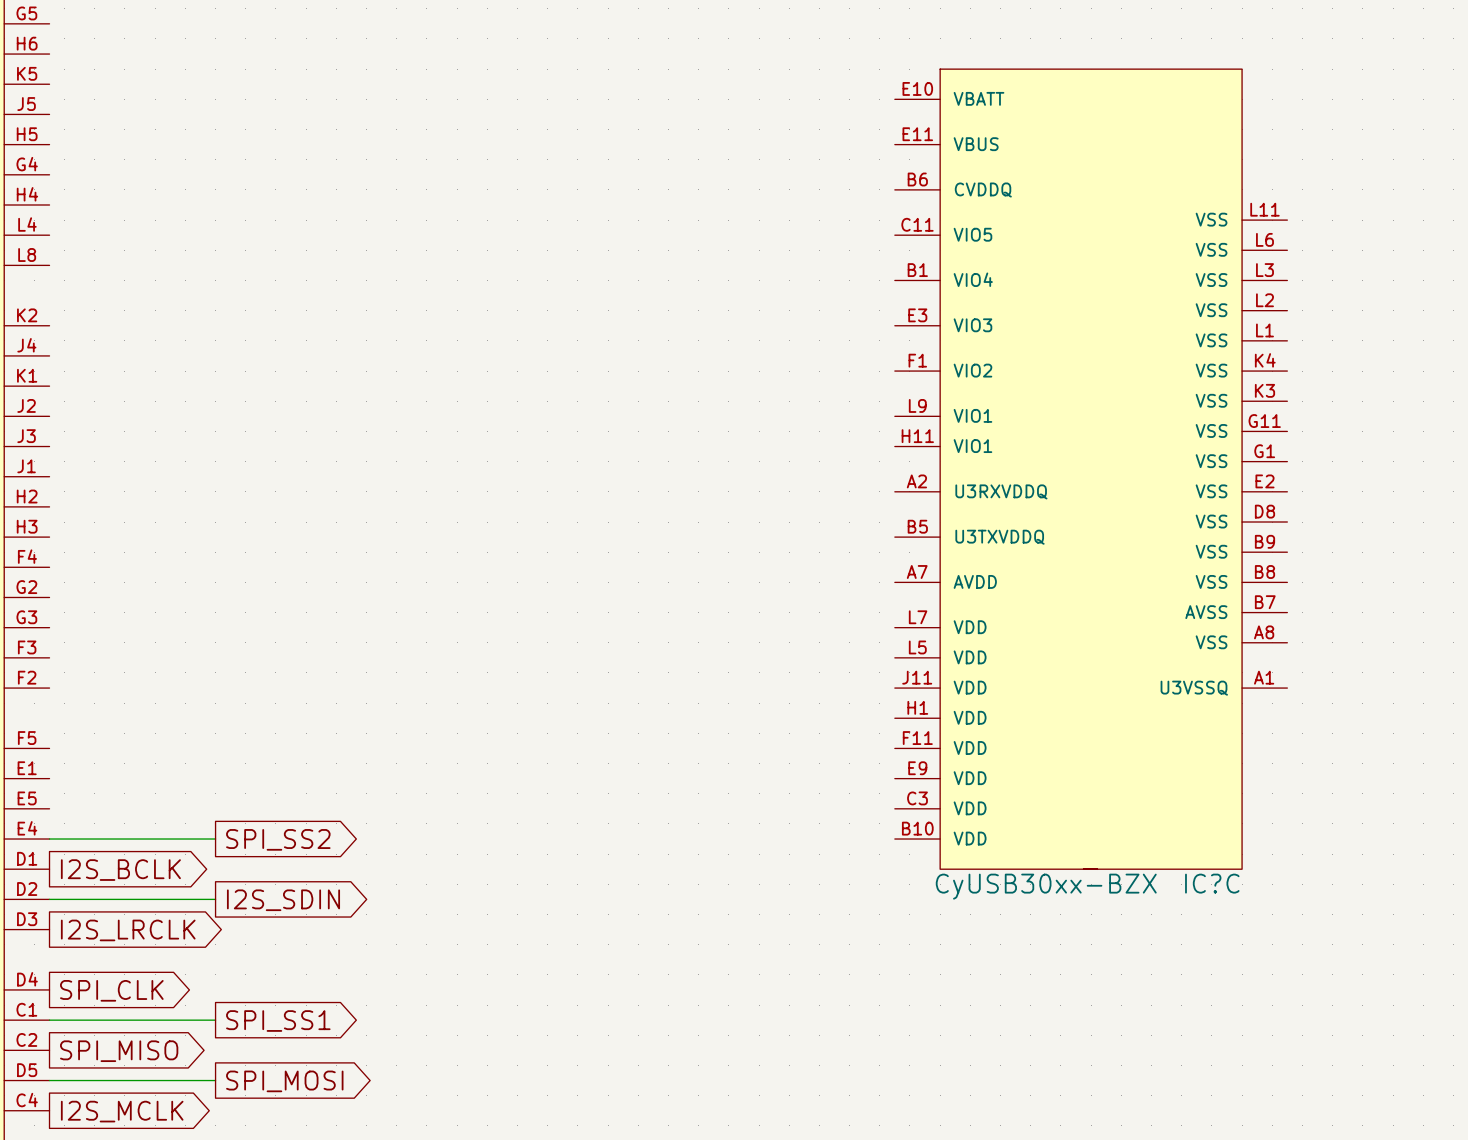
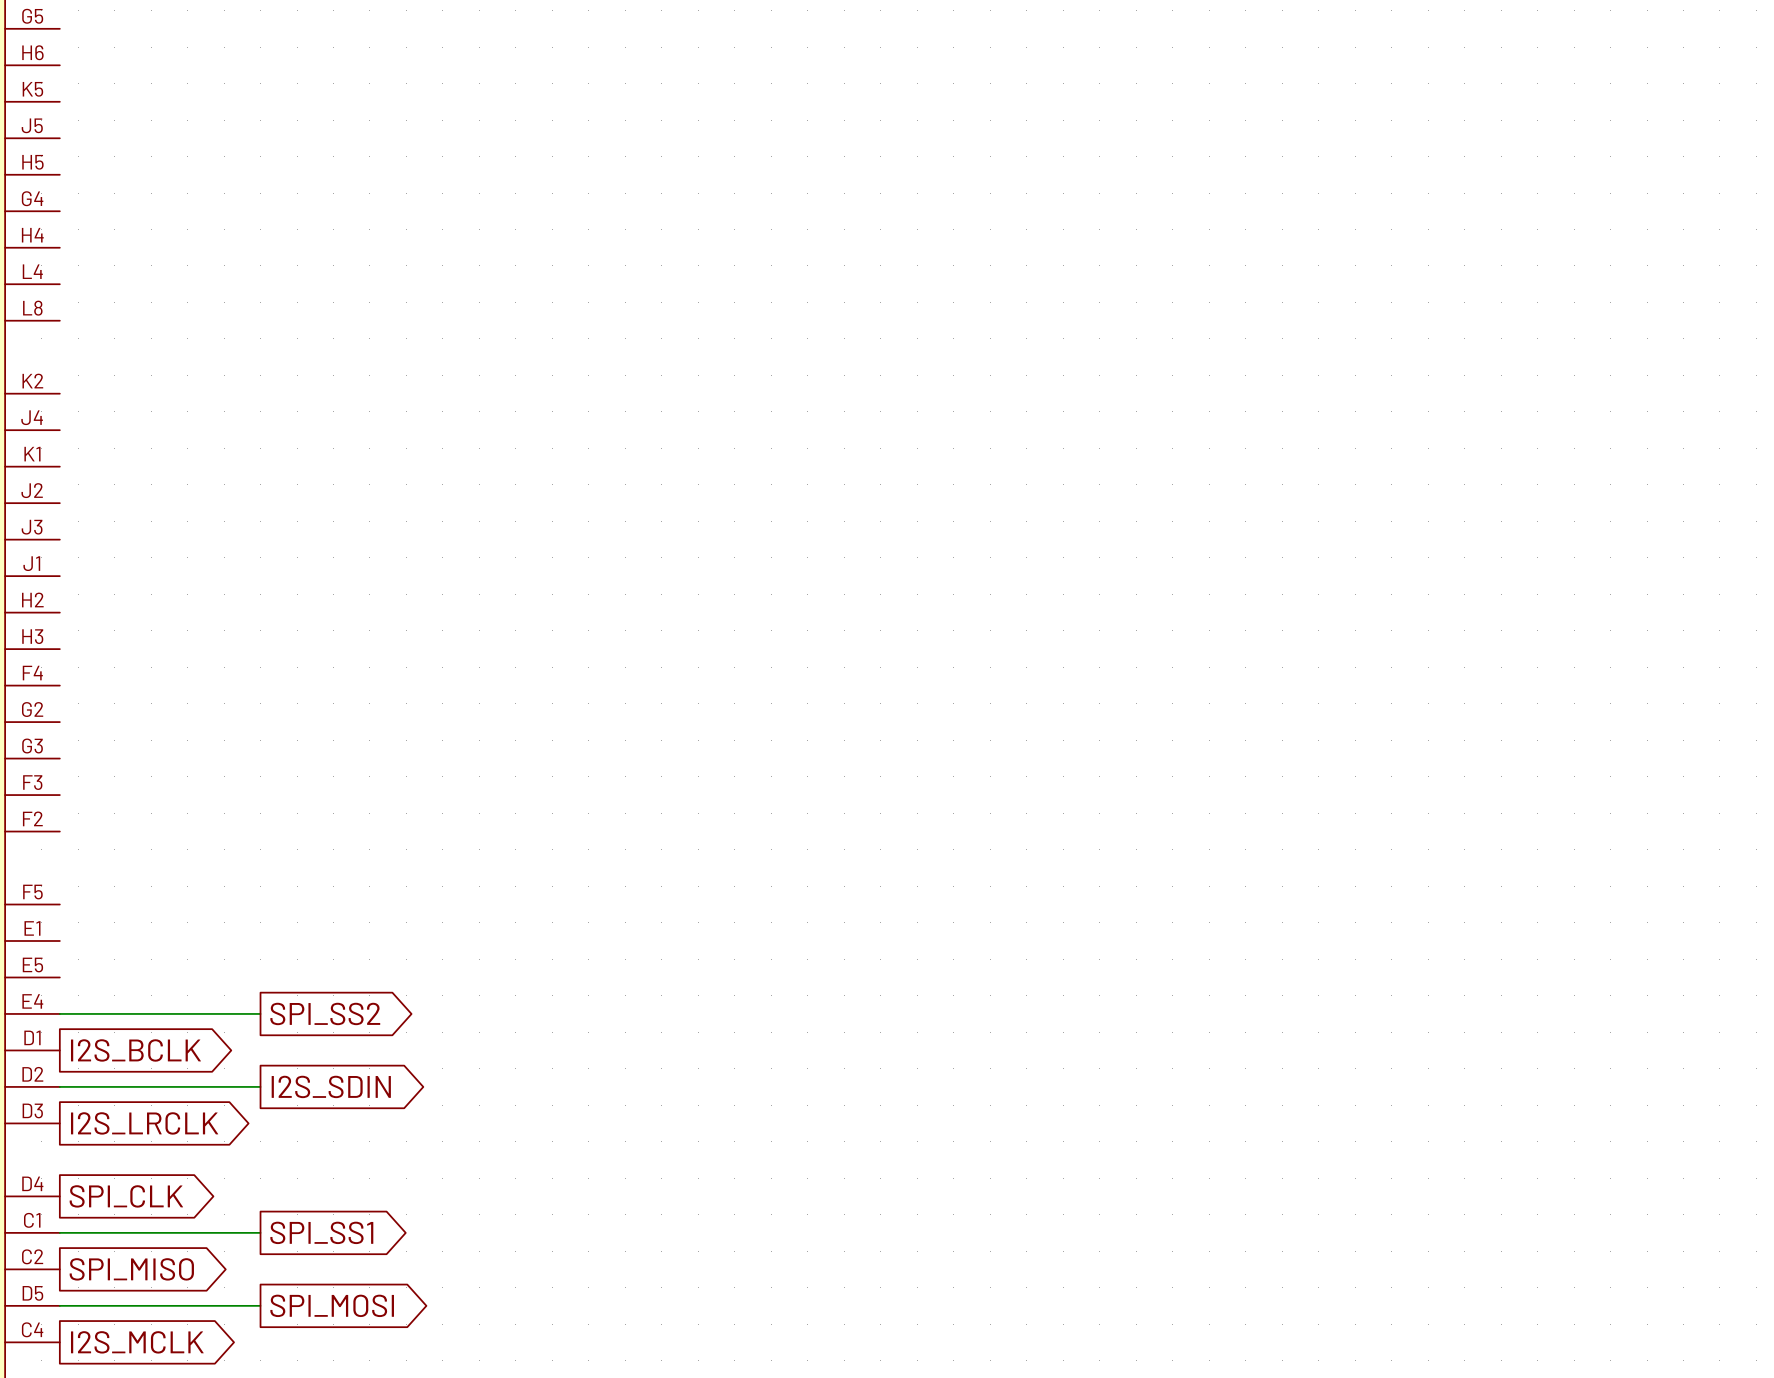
IC?C: CyUSB30xx-BZX (1091, 469) -> none

